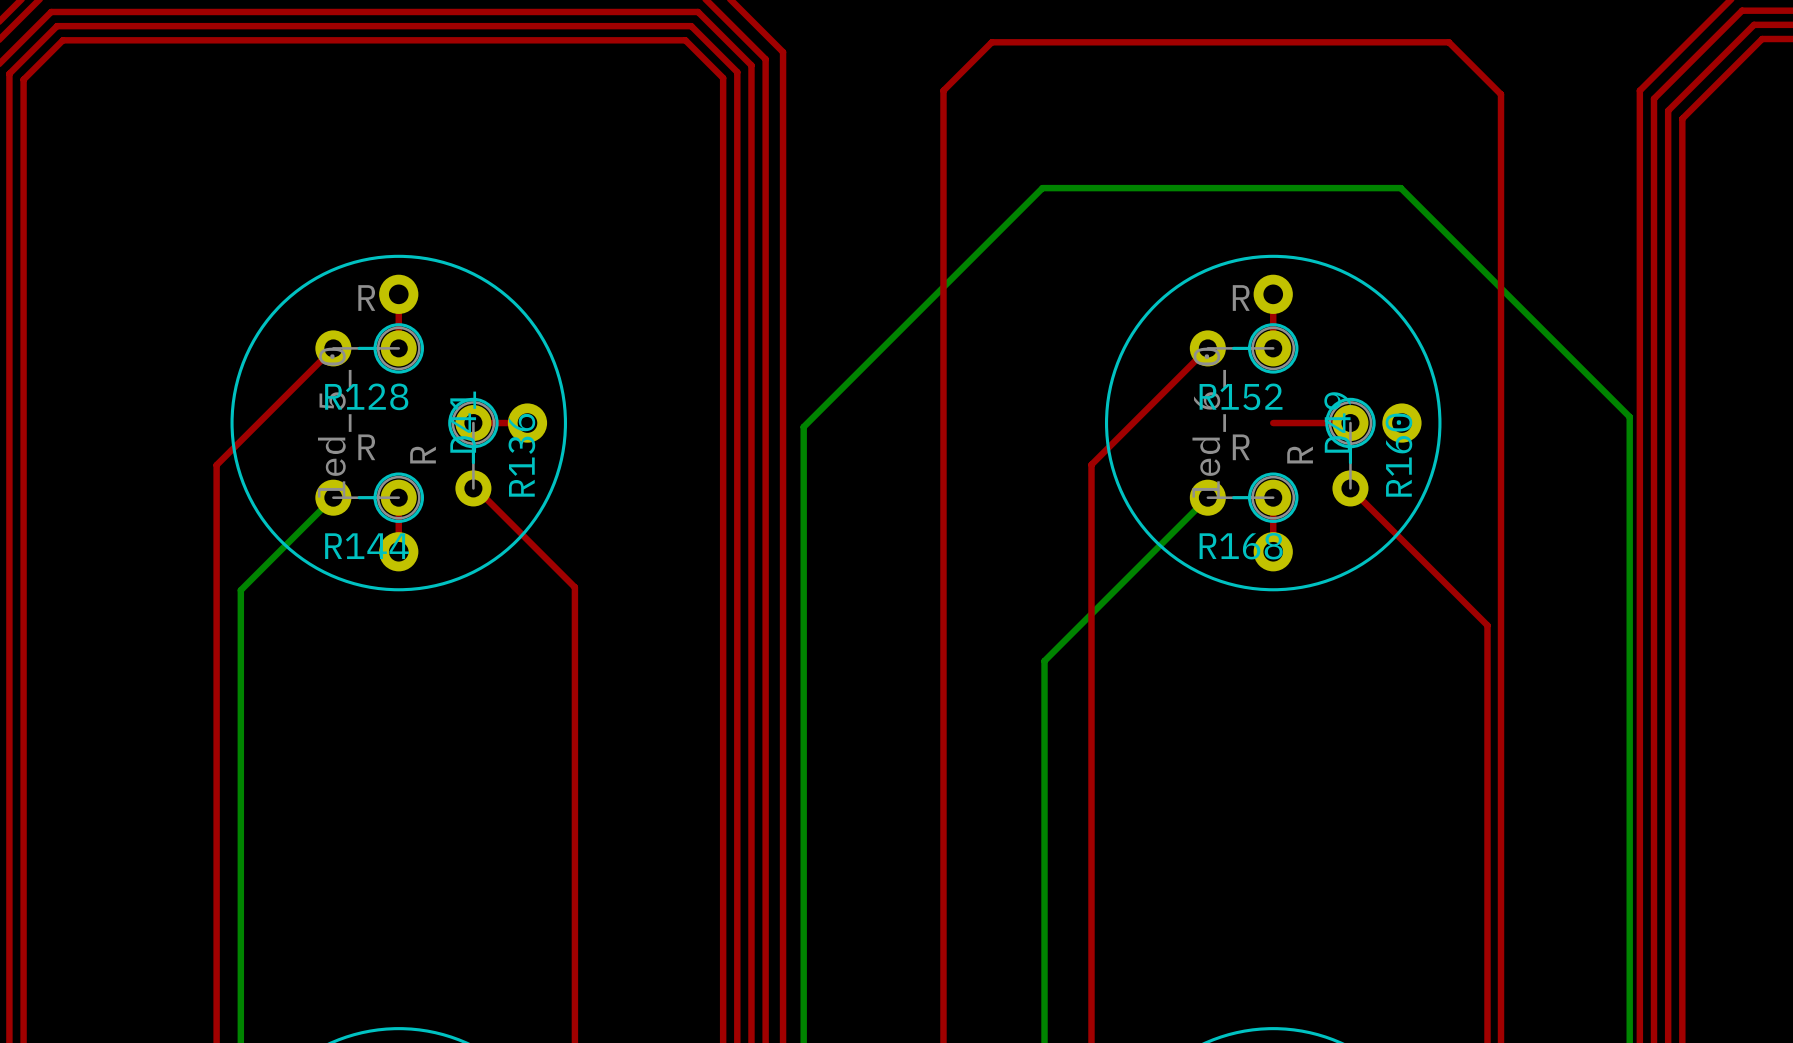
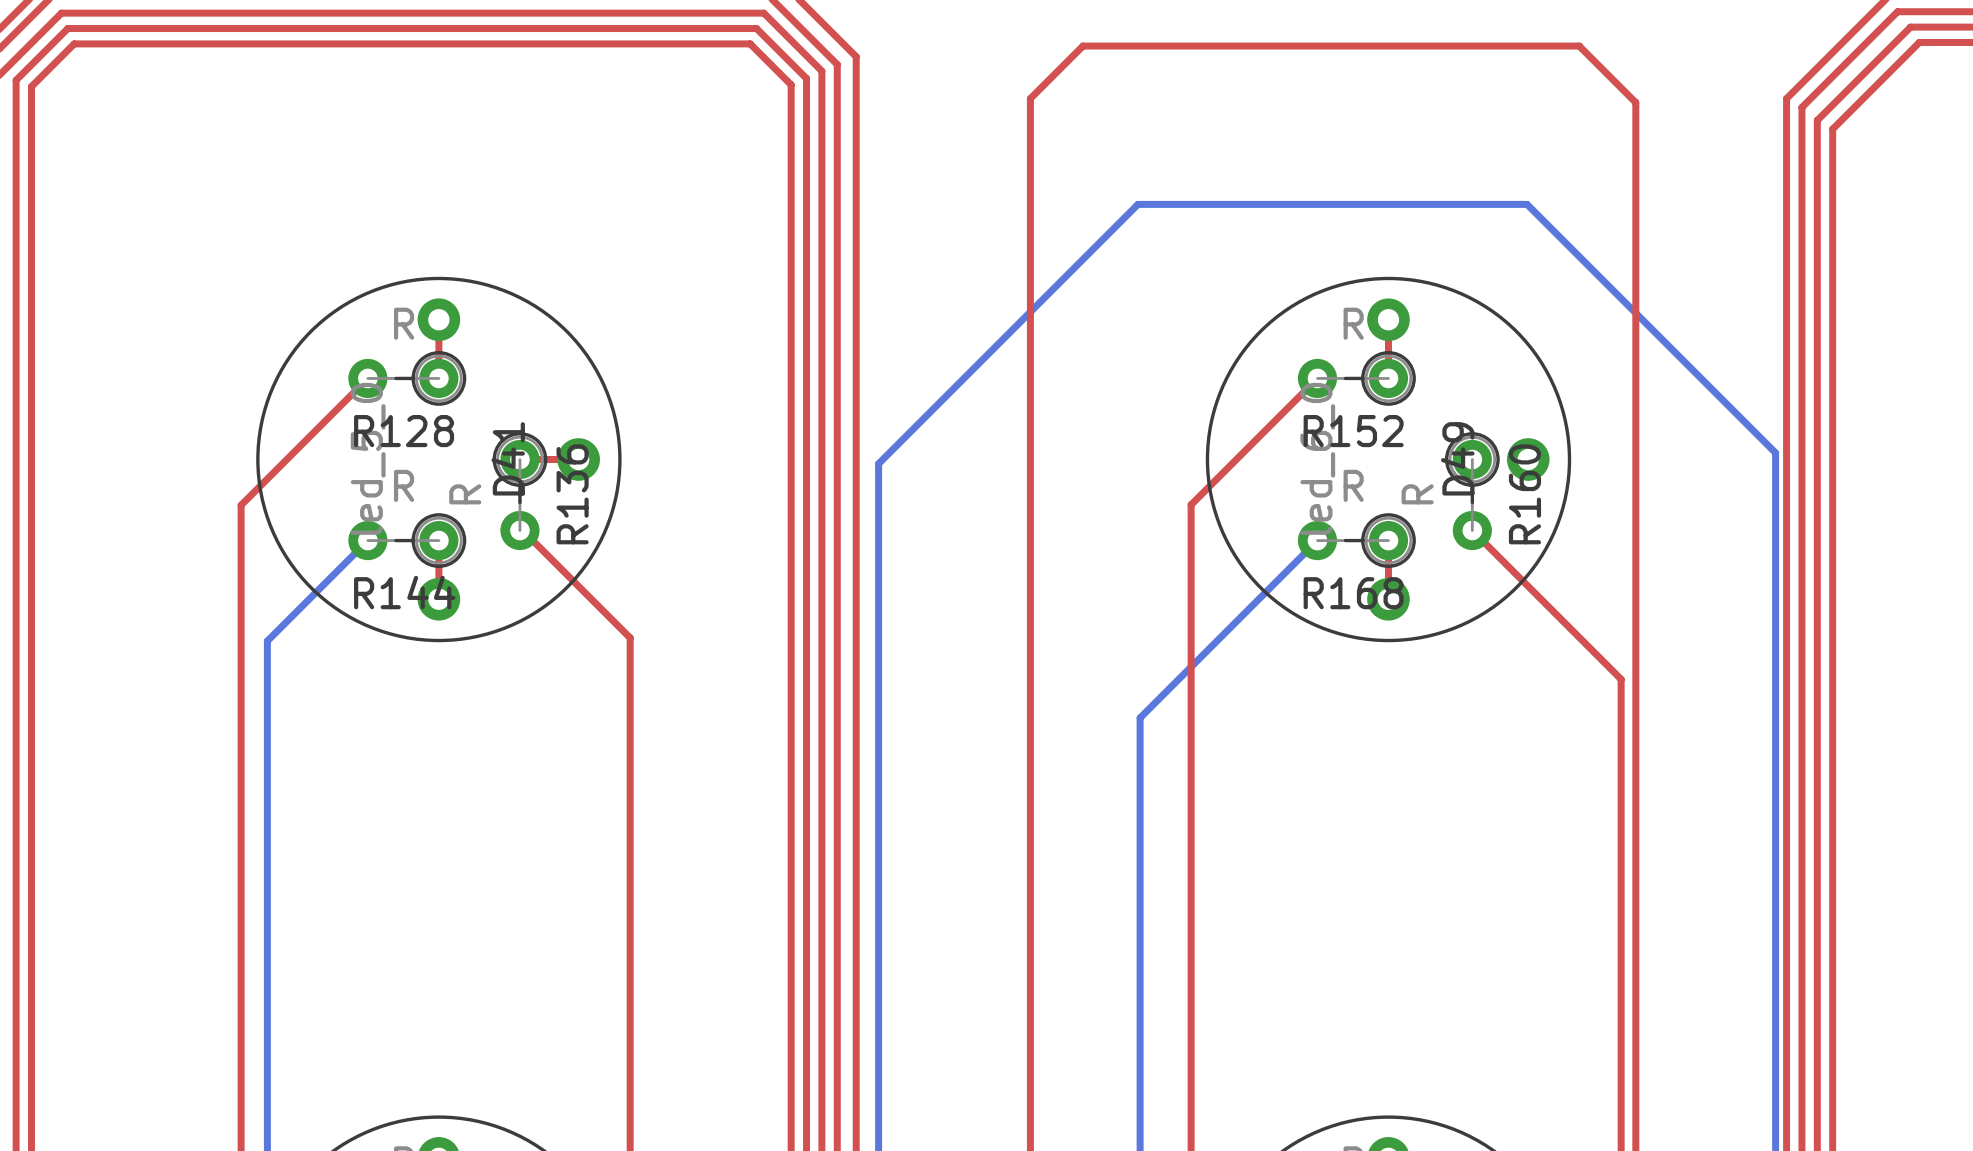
top track: (1273, 423) (1347, 423) -> none

